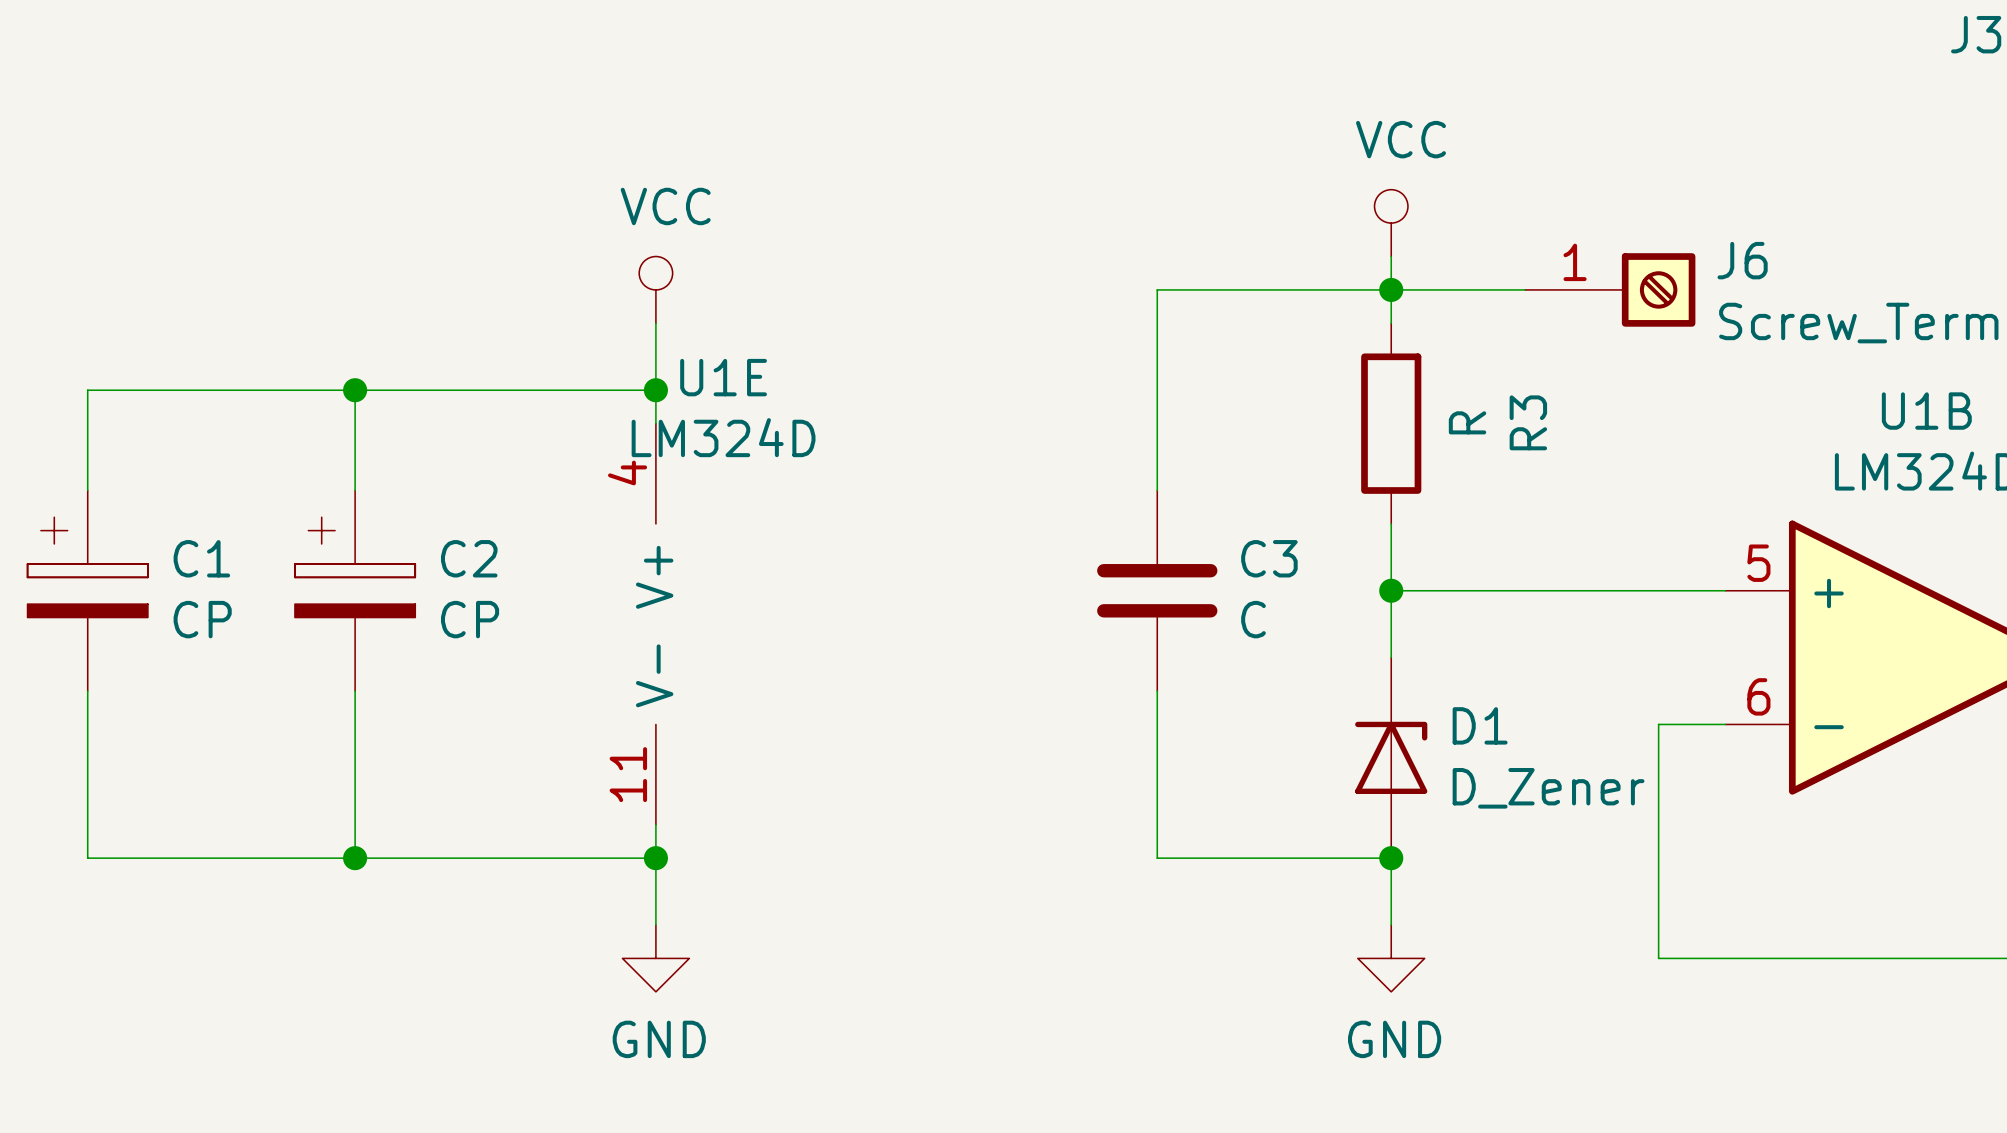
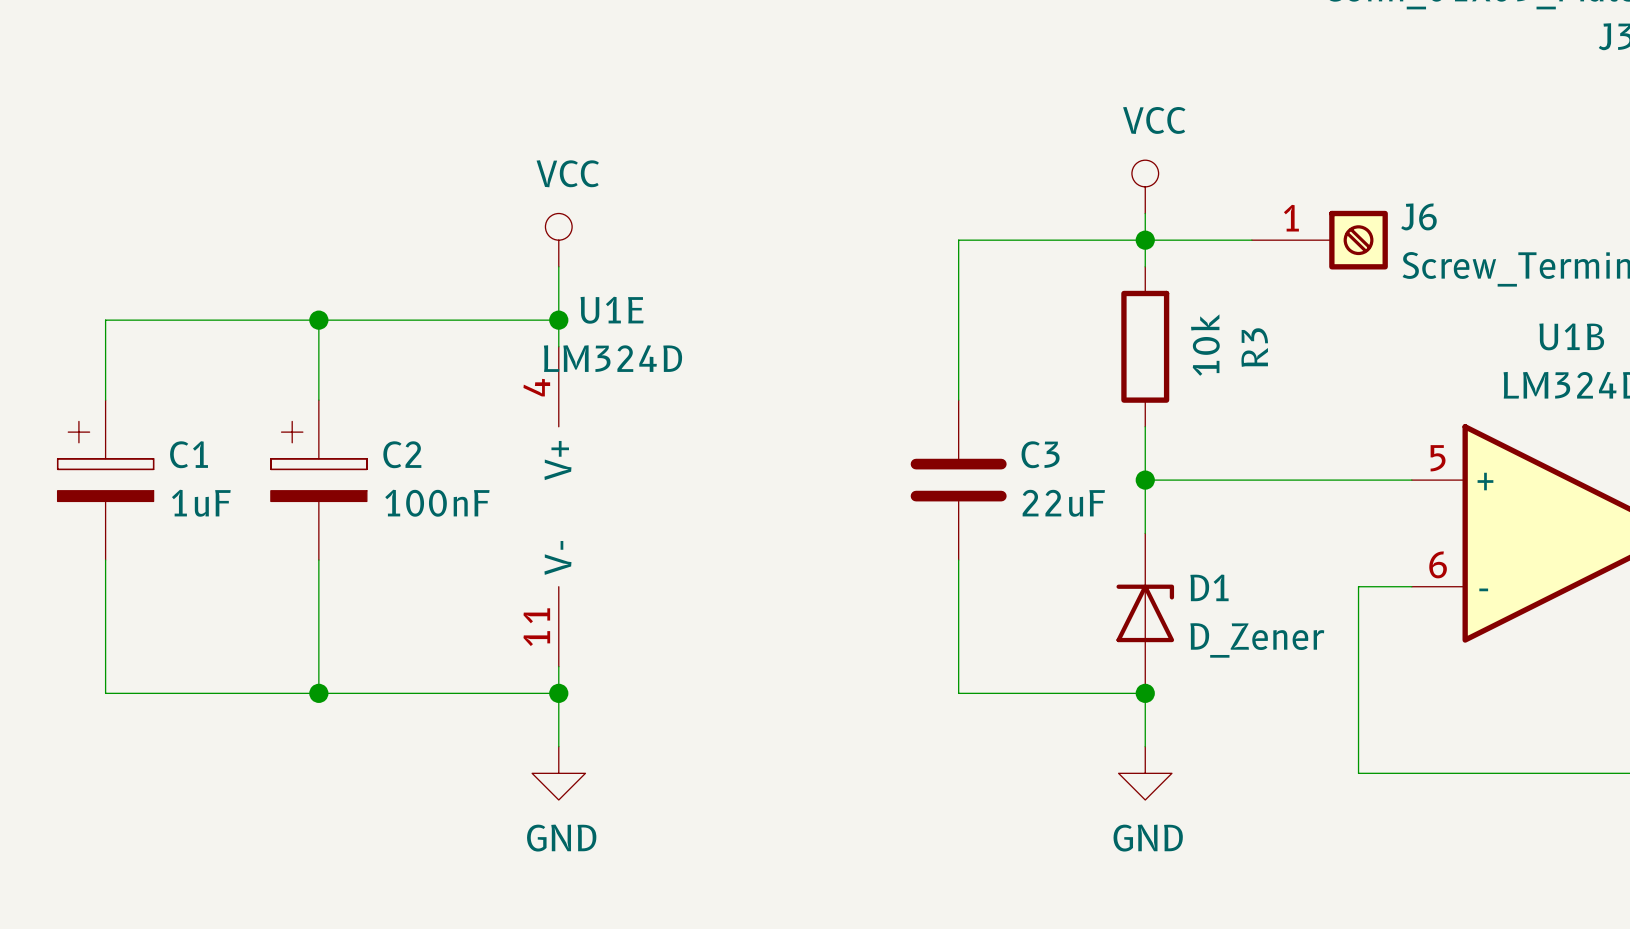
R3 value: R (1467, 422) -> 10k (1205, 345)
C1 value: CP (202, 619) -> 1uF (201, 503)
C2 value: CP (470, 619) -> 100nF (437, 503)
C3 value: C (1253, 619) -> 22uF (1063, 503)

